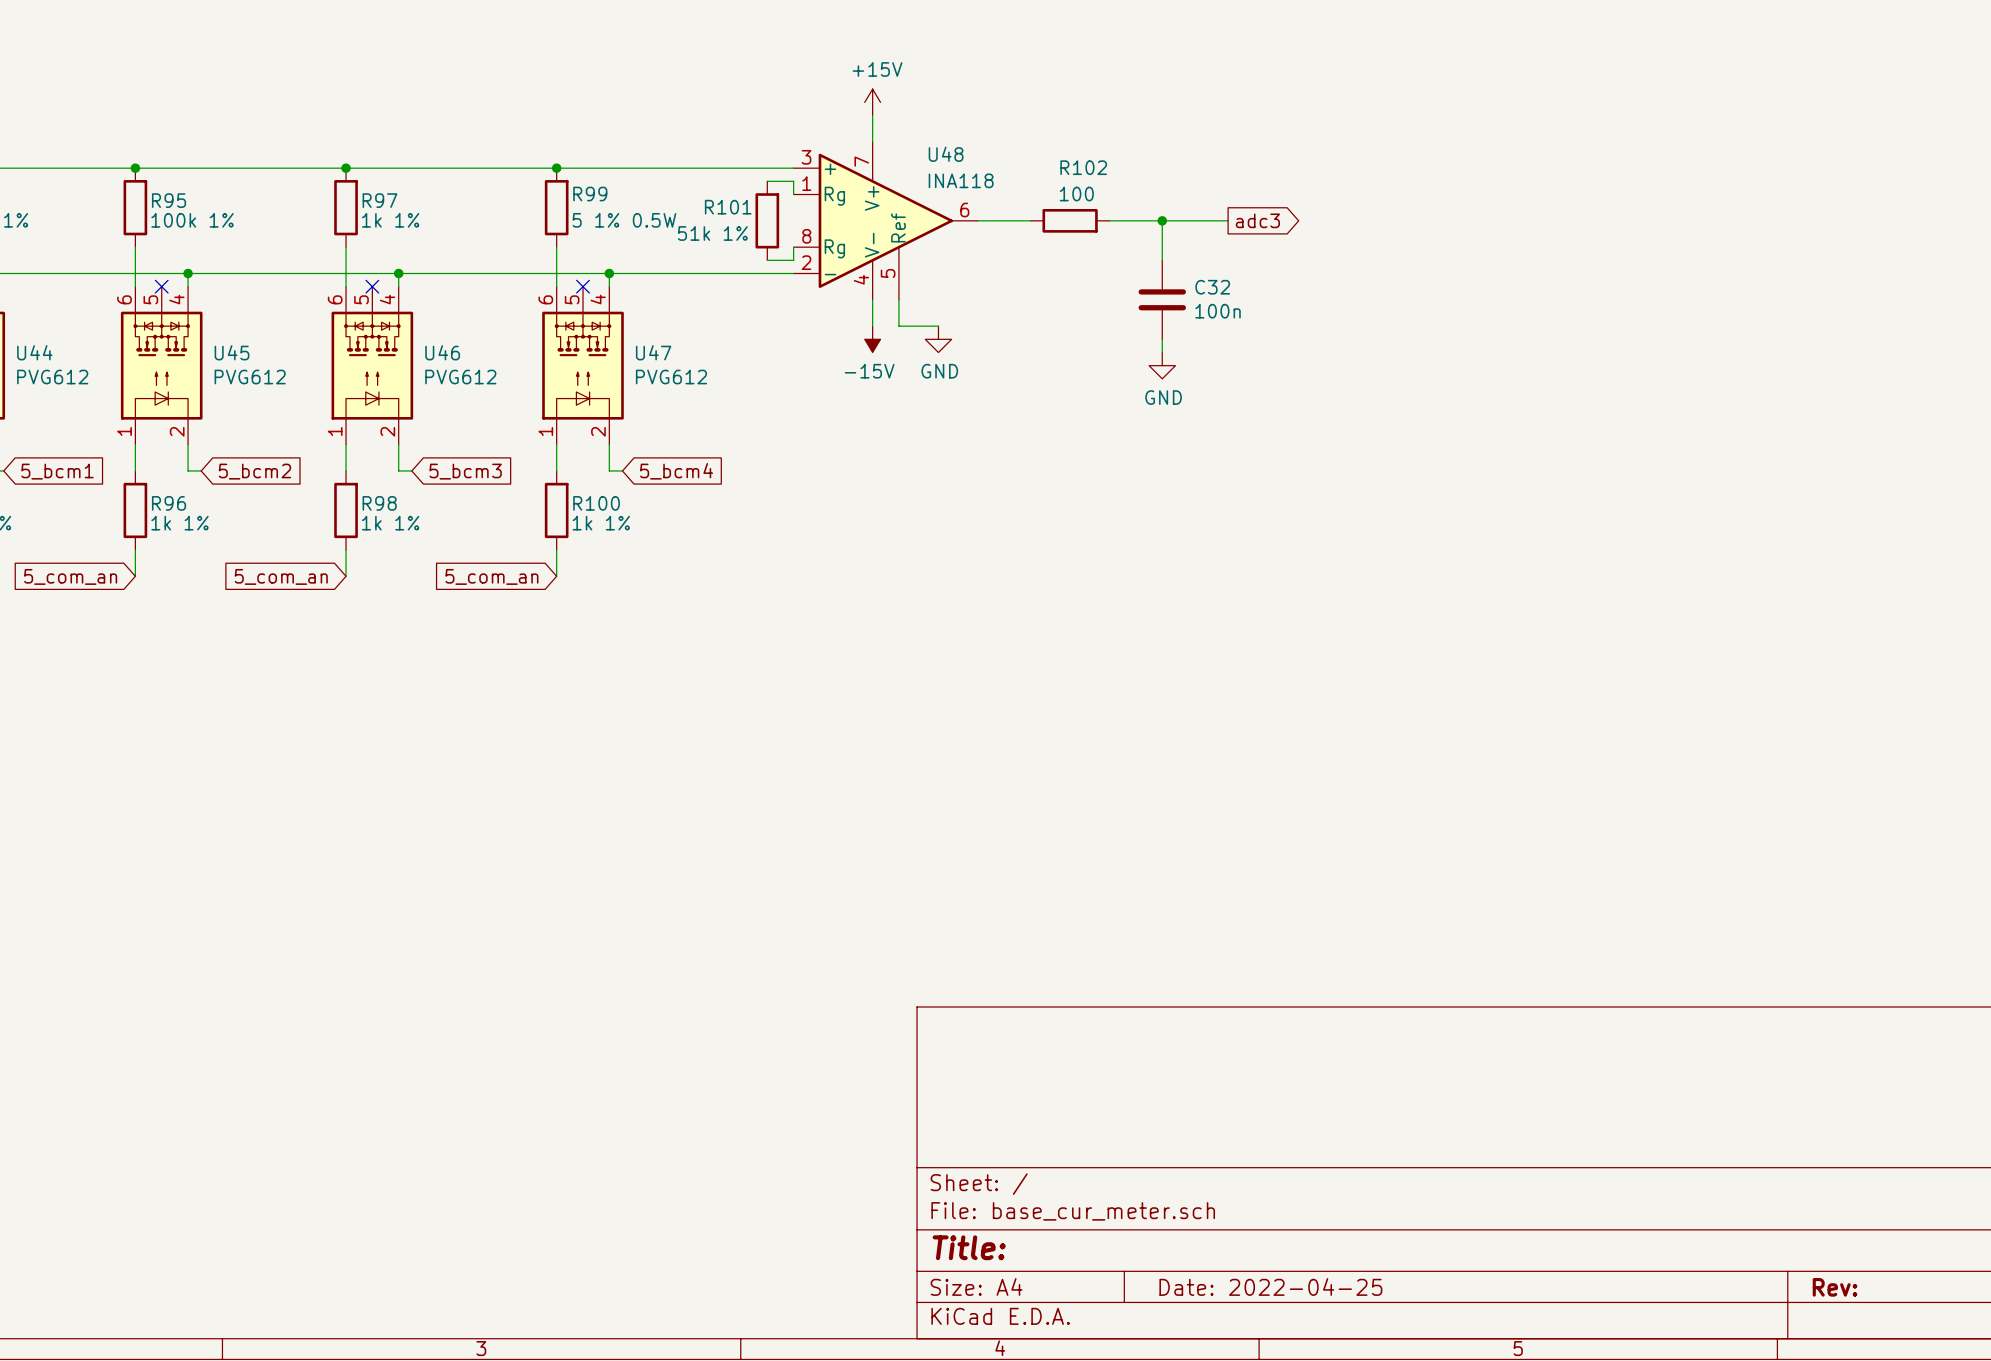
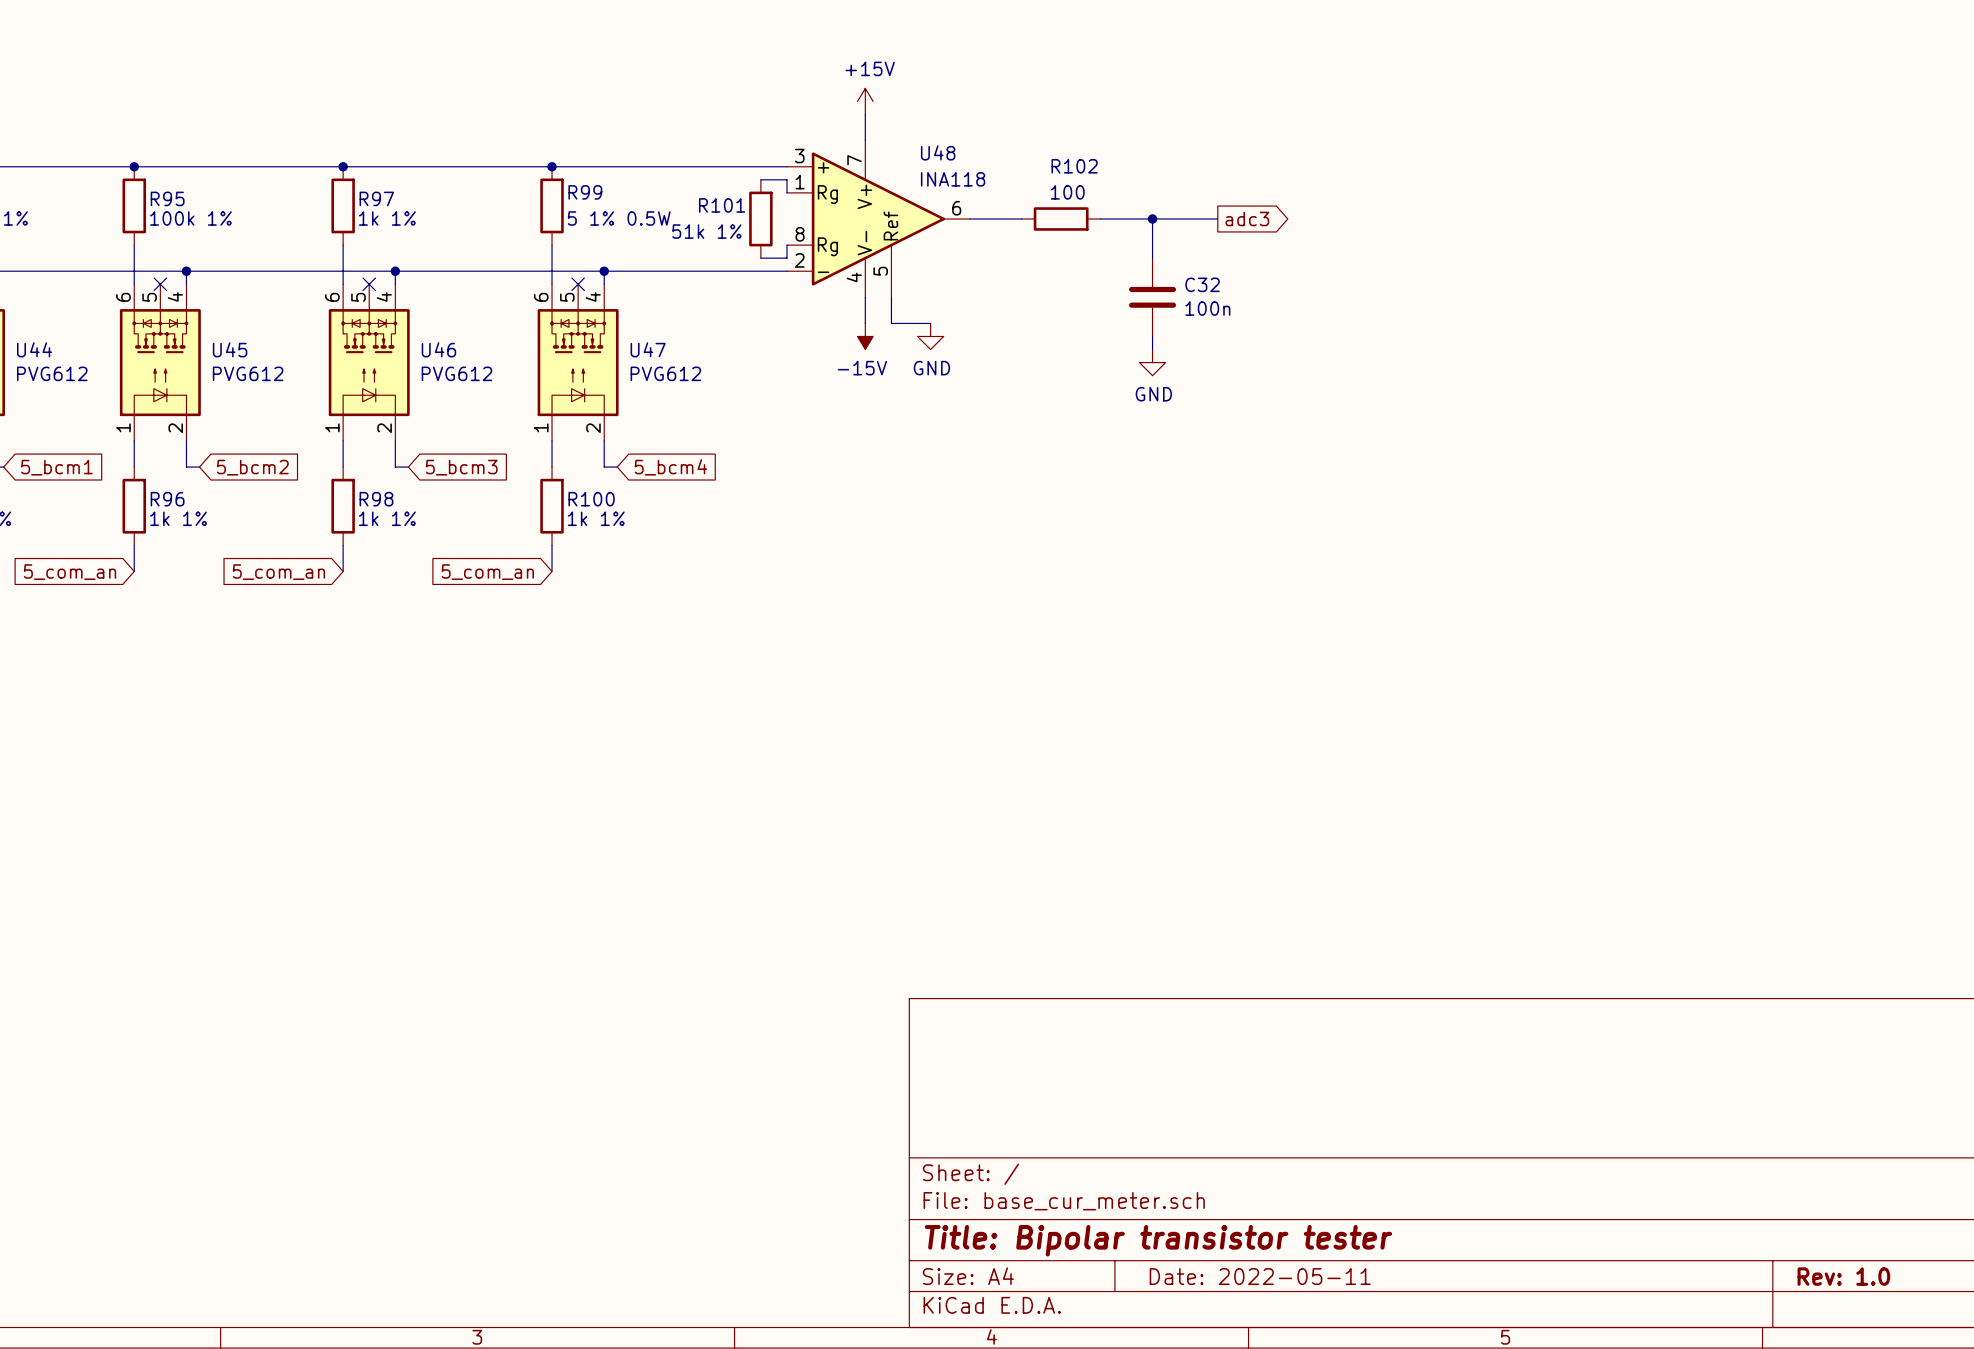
title block: Title: (969, 1247) -> Title: Bipolar transistor tester (1158, 1240)
title block: Date: 2022-04-25 (1270, 1286) -> Date: 2022-05-11 (1260, 1276)
title block: Rev: (1835, 1287) -> Rev: 1.0 (1843, 1276)

